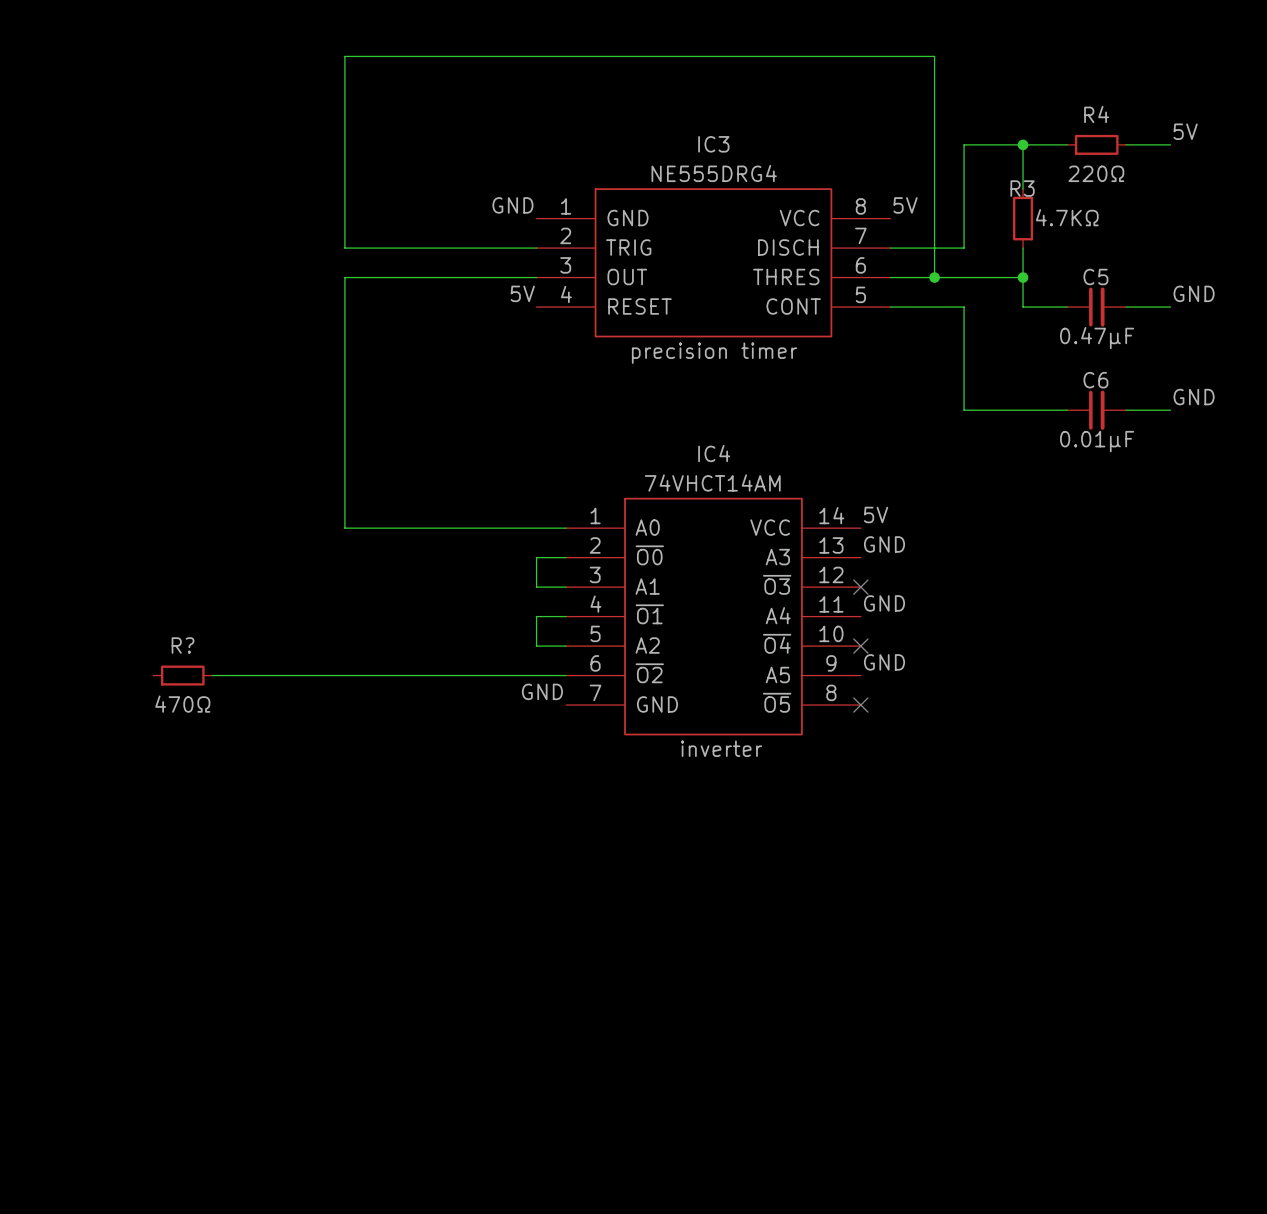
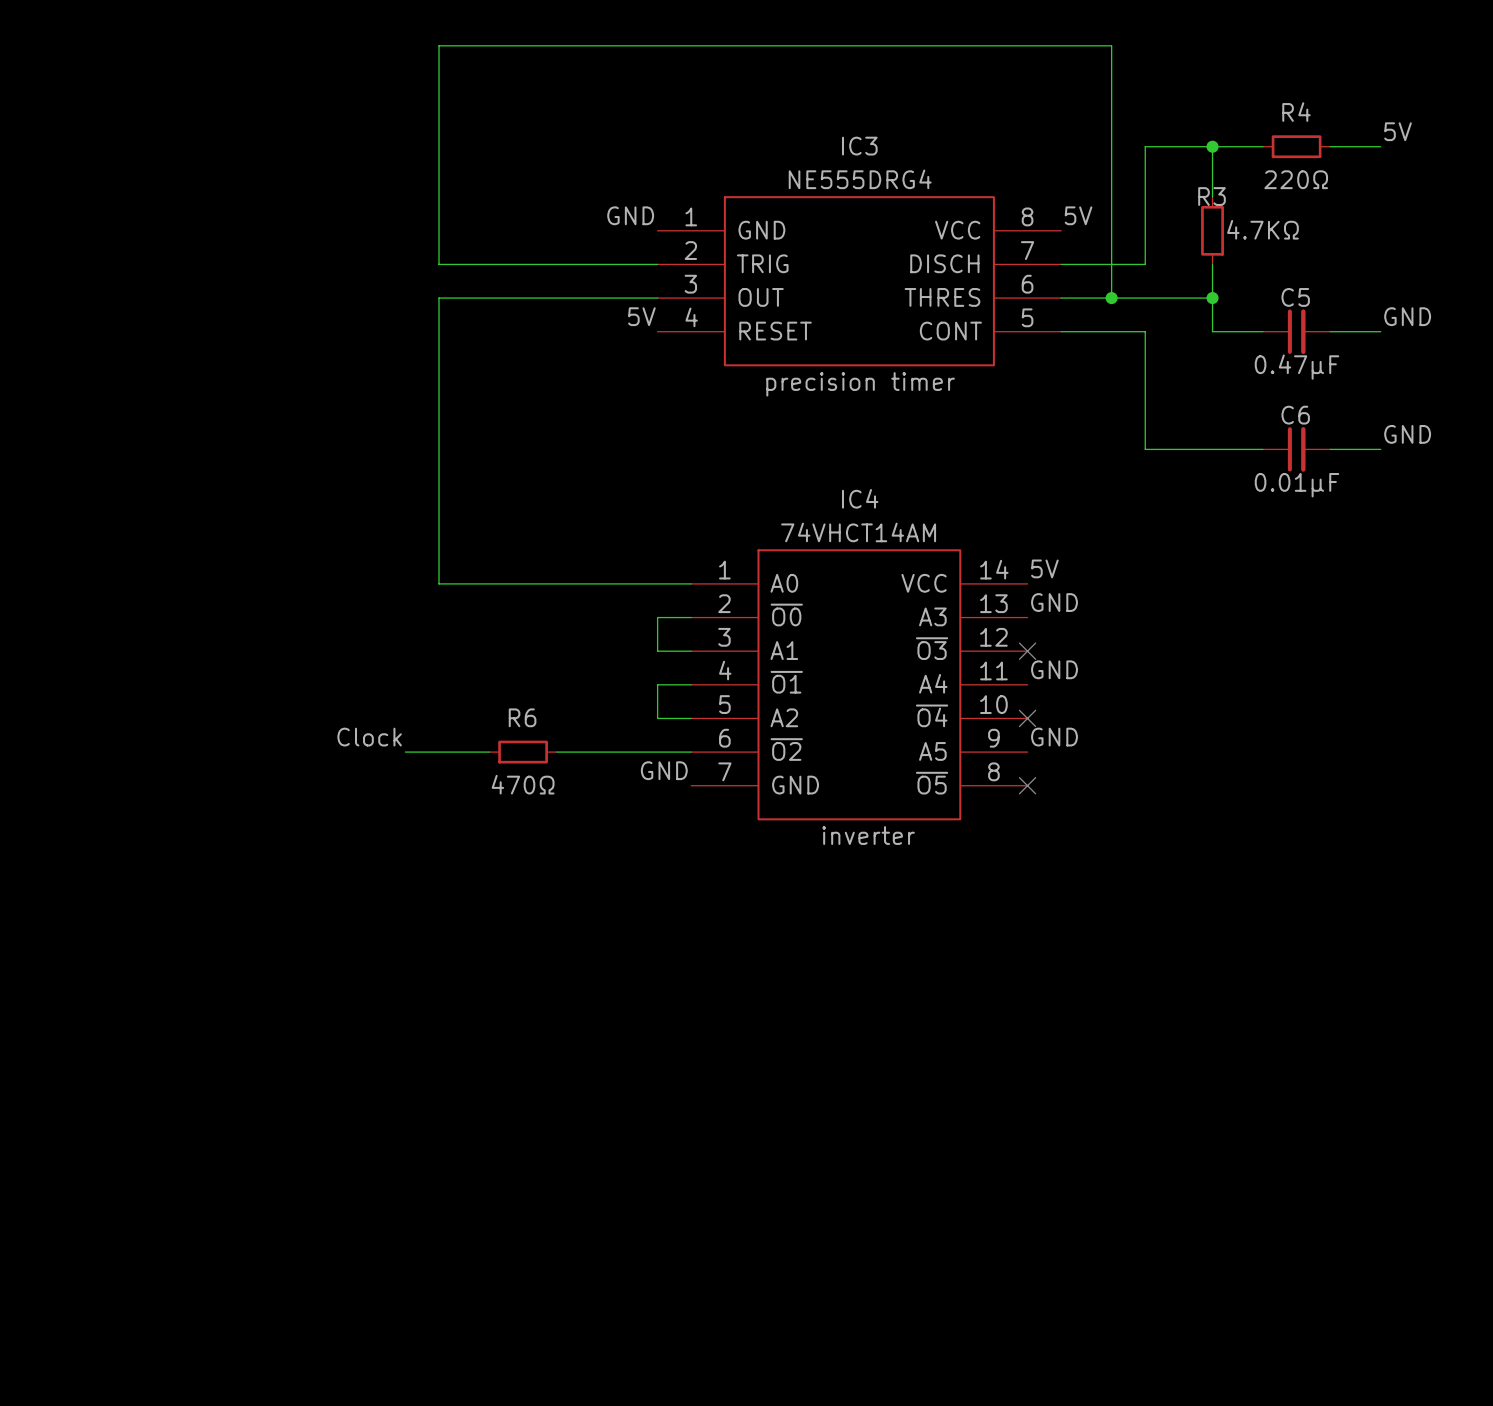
label: none -> Clock (369, 737)
R?: (182, 675) -> none
wire: (212, 675) (315, 675) -> none
wire: (389, 675) (448, 675) -> none
R6: none -> (523, 752)

